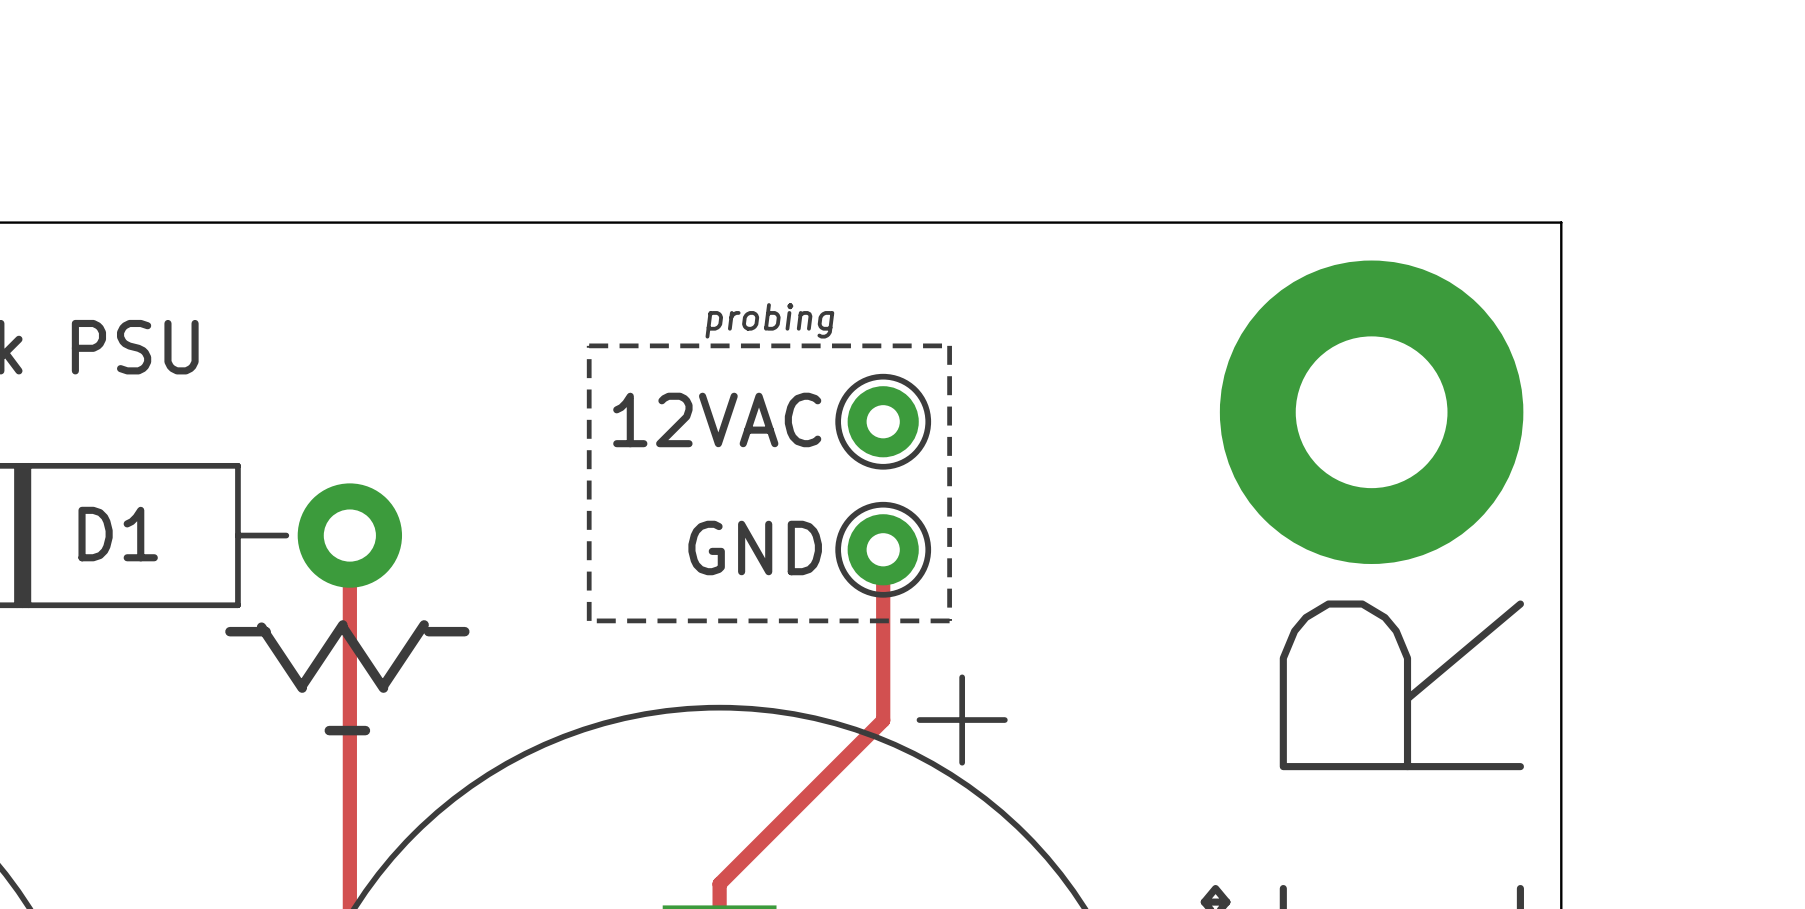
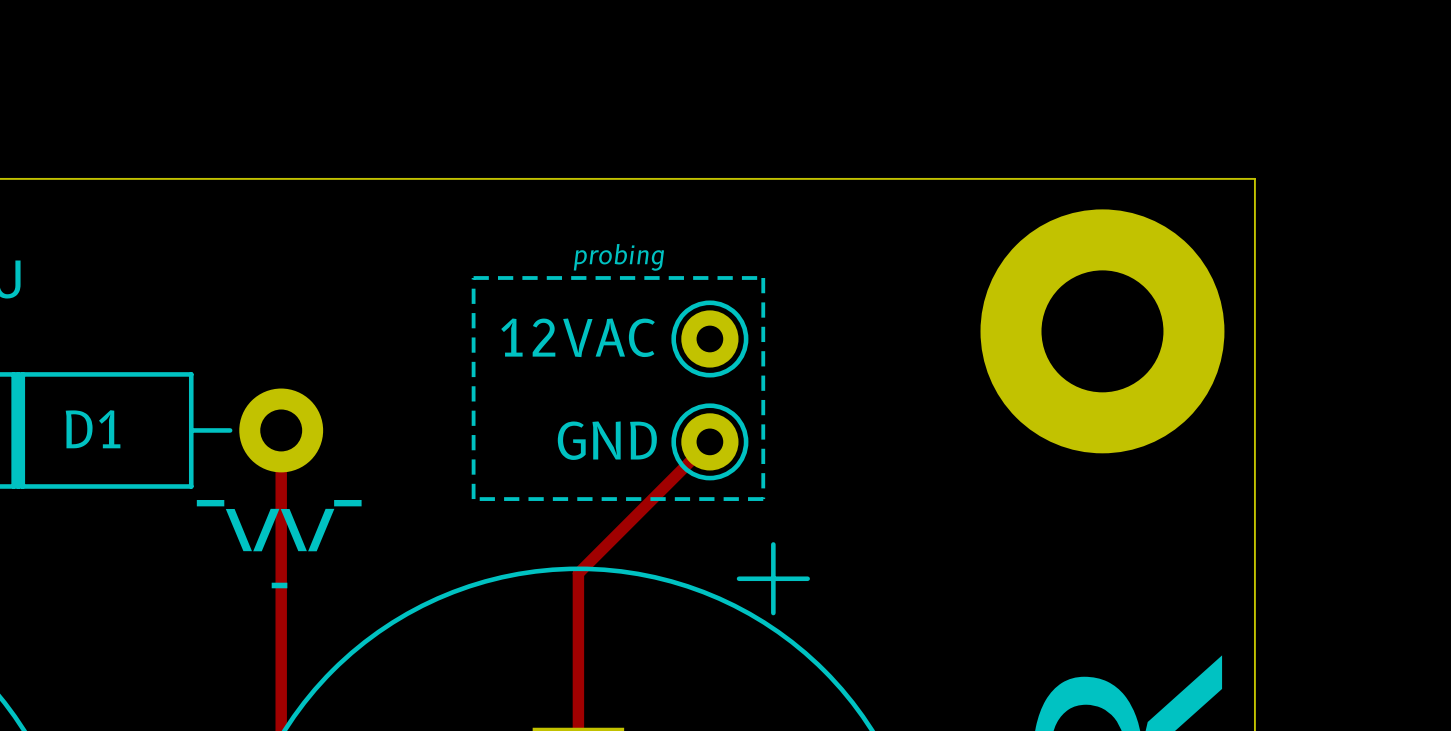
track: (883, 549) (883, 720) (719, 883) -> (709, 441) (578, 573) (578, 710)

